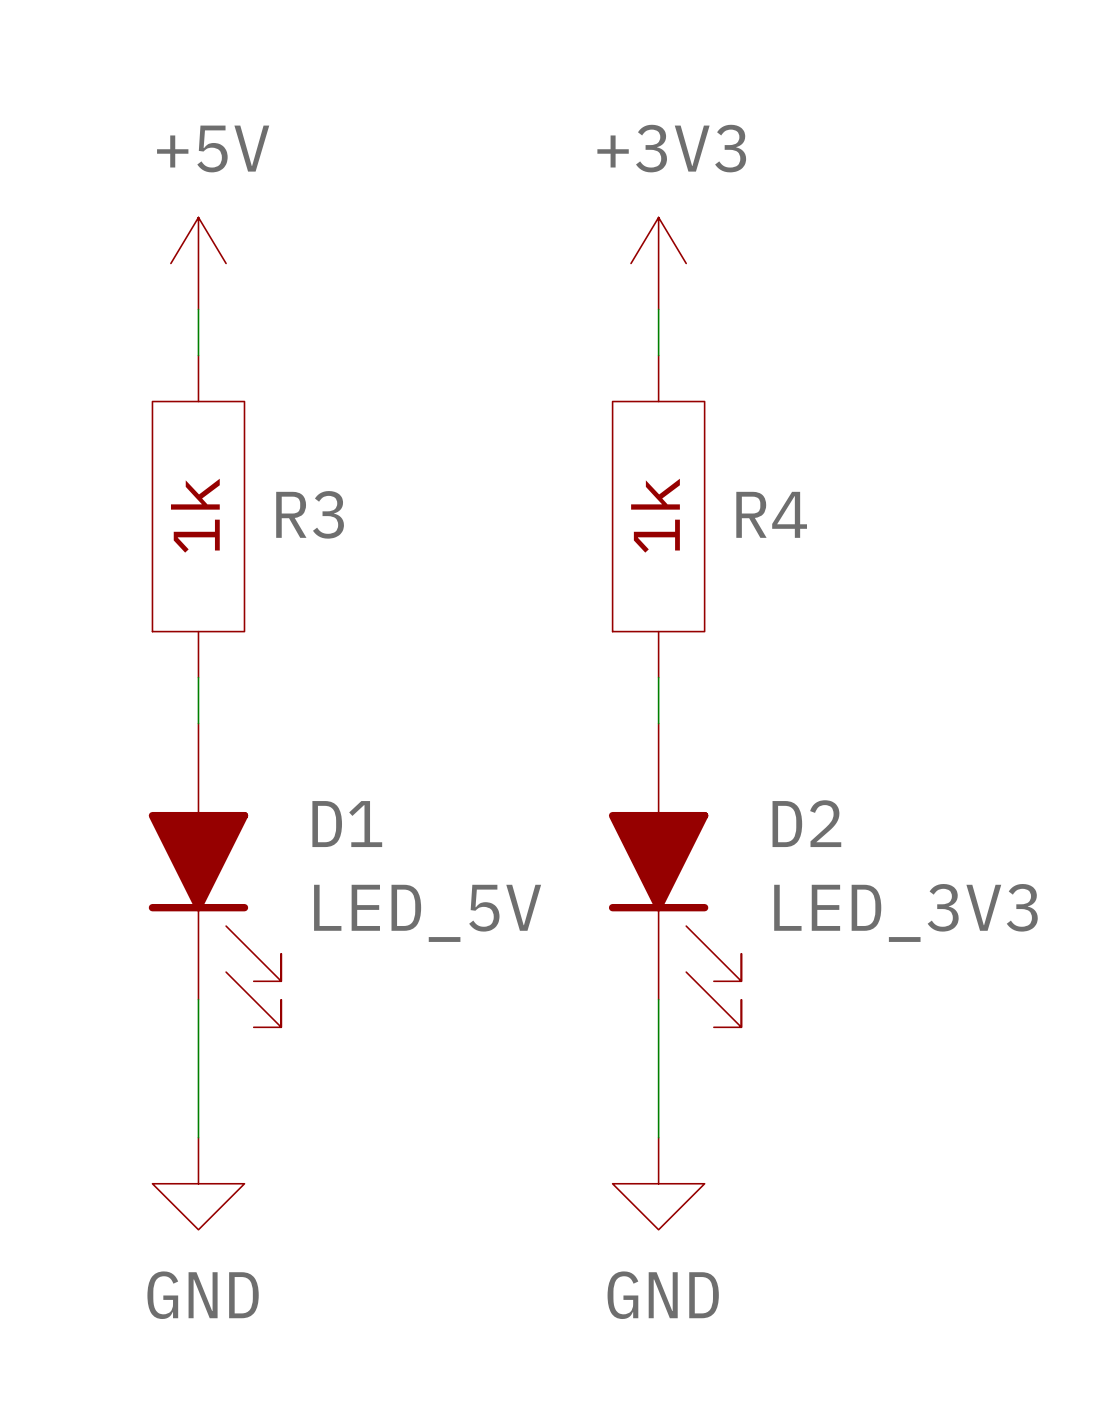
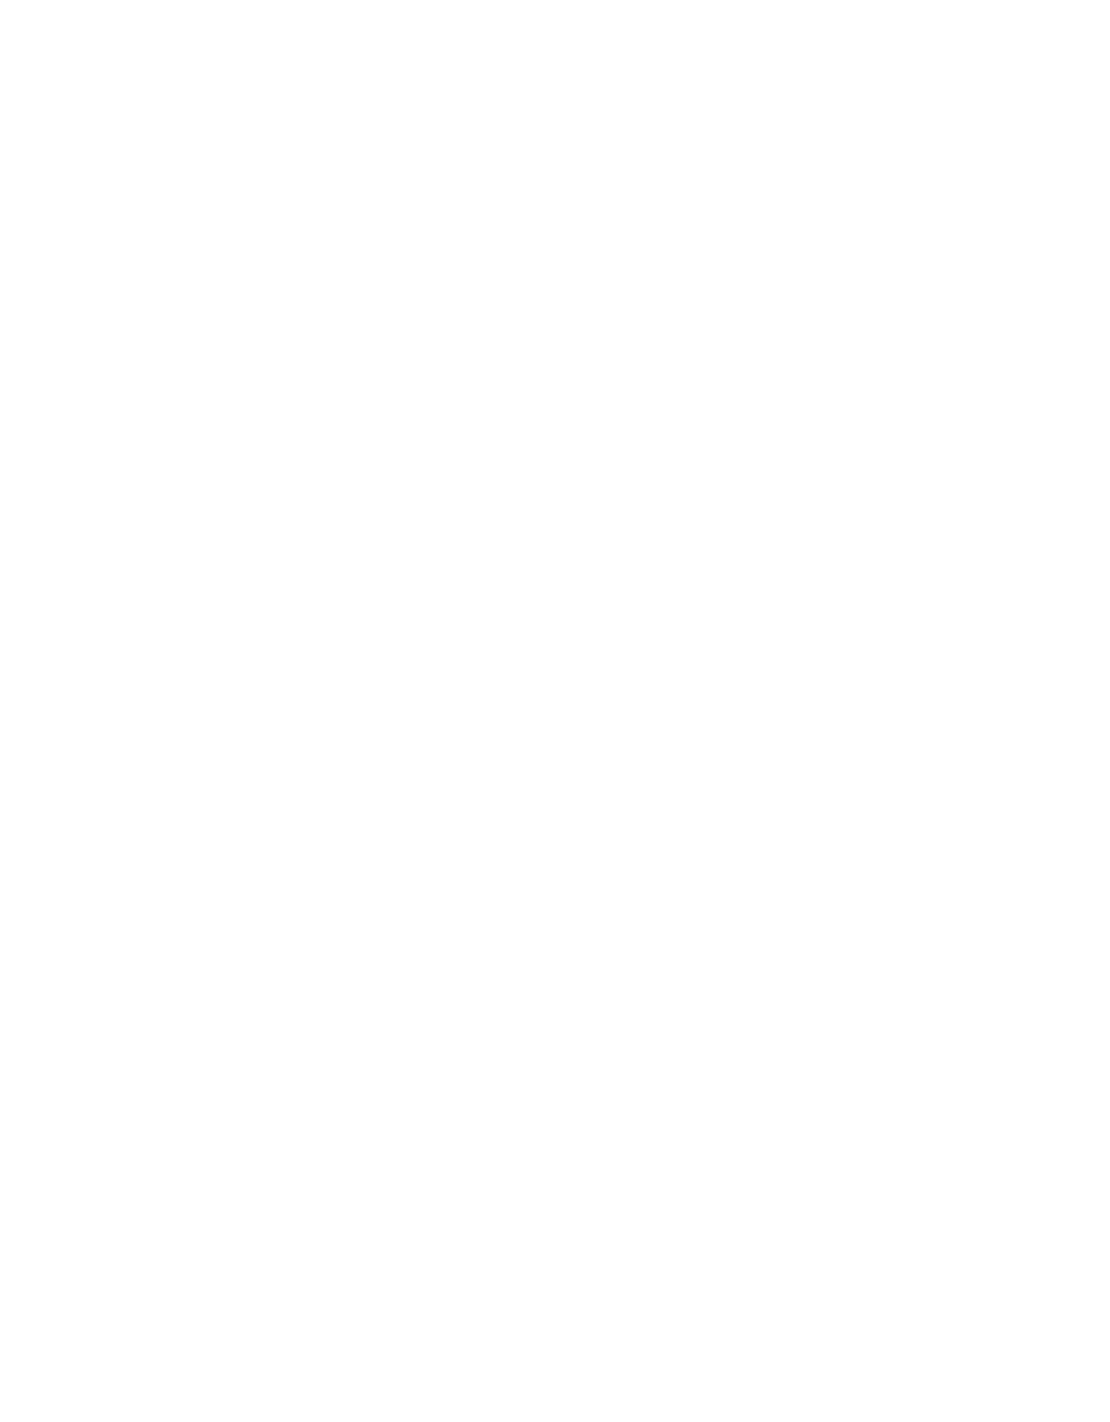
power symbol: +5V (198, 263) -> none
power symbol: +3V3 (658, 263) -> none
wire: (198, 309) (198, 355) -> none
wire: (658, 309) (658, 355) -> none
R3: (198, 516) -> none
R4: (658, 516) -> none
wire: (198, 677) (198, 723) -> none
wire: (658, 677) (658, 723) -> none
D1: LED_5V (215, 875) -> none
D2: LED_3V3 (675, 875) -> none
wire: (198, 999) (198, 1137) -> none
wire: (658, 999) (658, 1137) -> none
power symbol: GND (198, 1183) -> none
power symbol: GND (658, 1183) -> none

